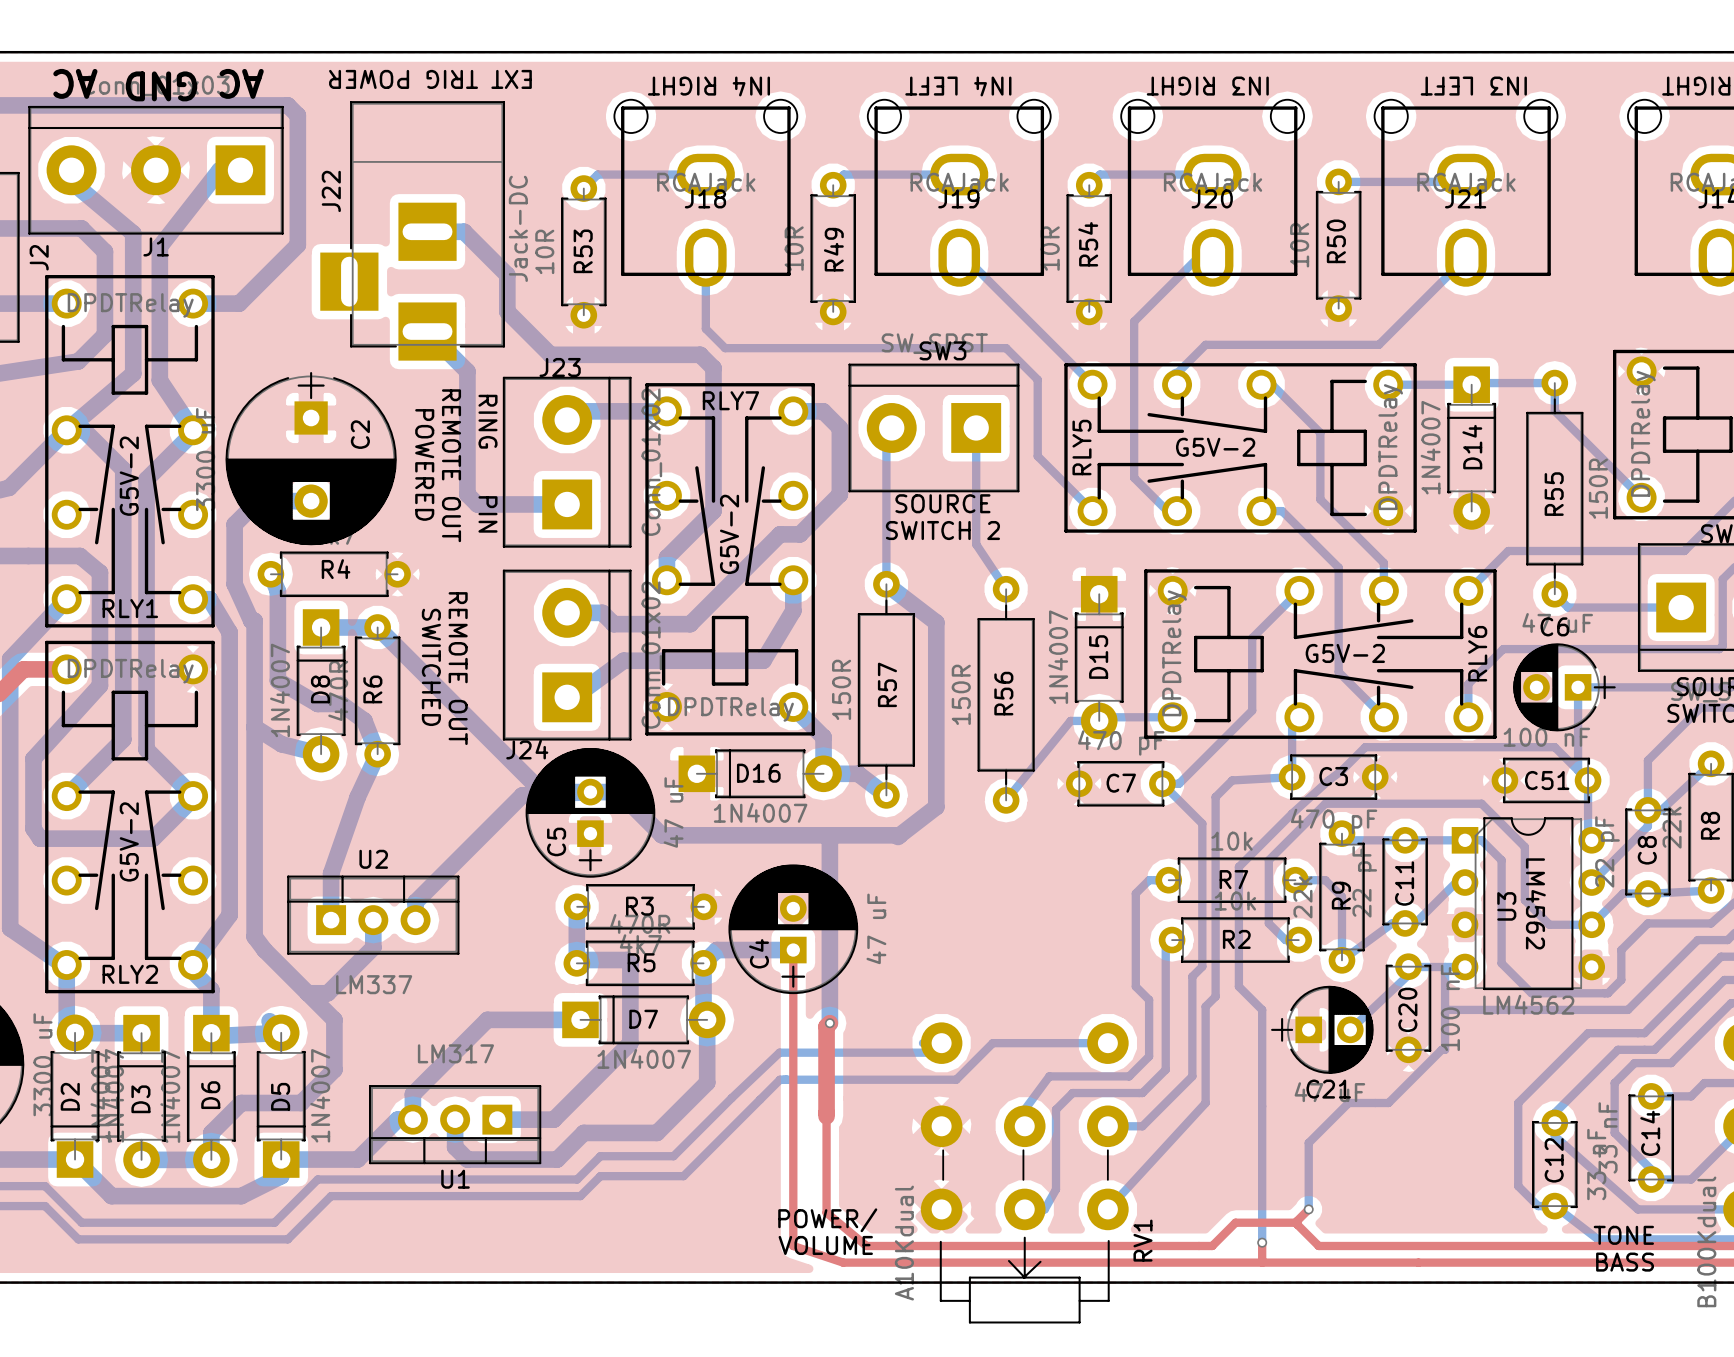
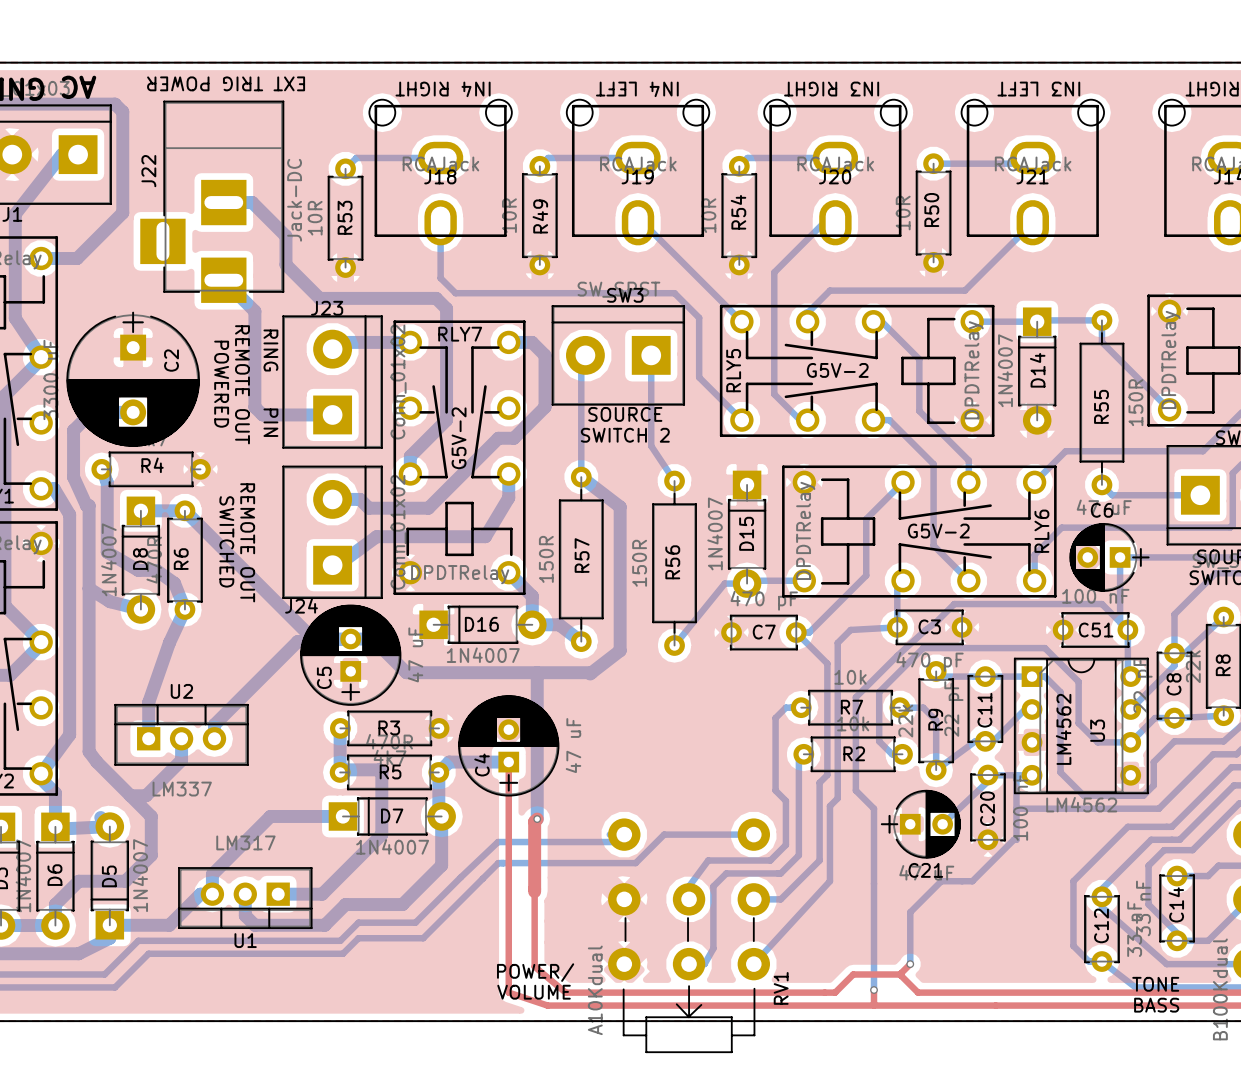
U3 footprint: [1451, 817, 1606, 991] -> [1014, 657, 1149, 795]
text rotation: 0° (1535, 903) -> 180° (1063, 729)
U3 name position: U3 (1506, 906) -> U3 (1097, 730)

